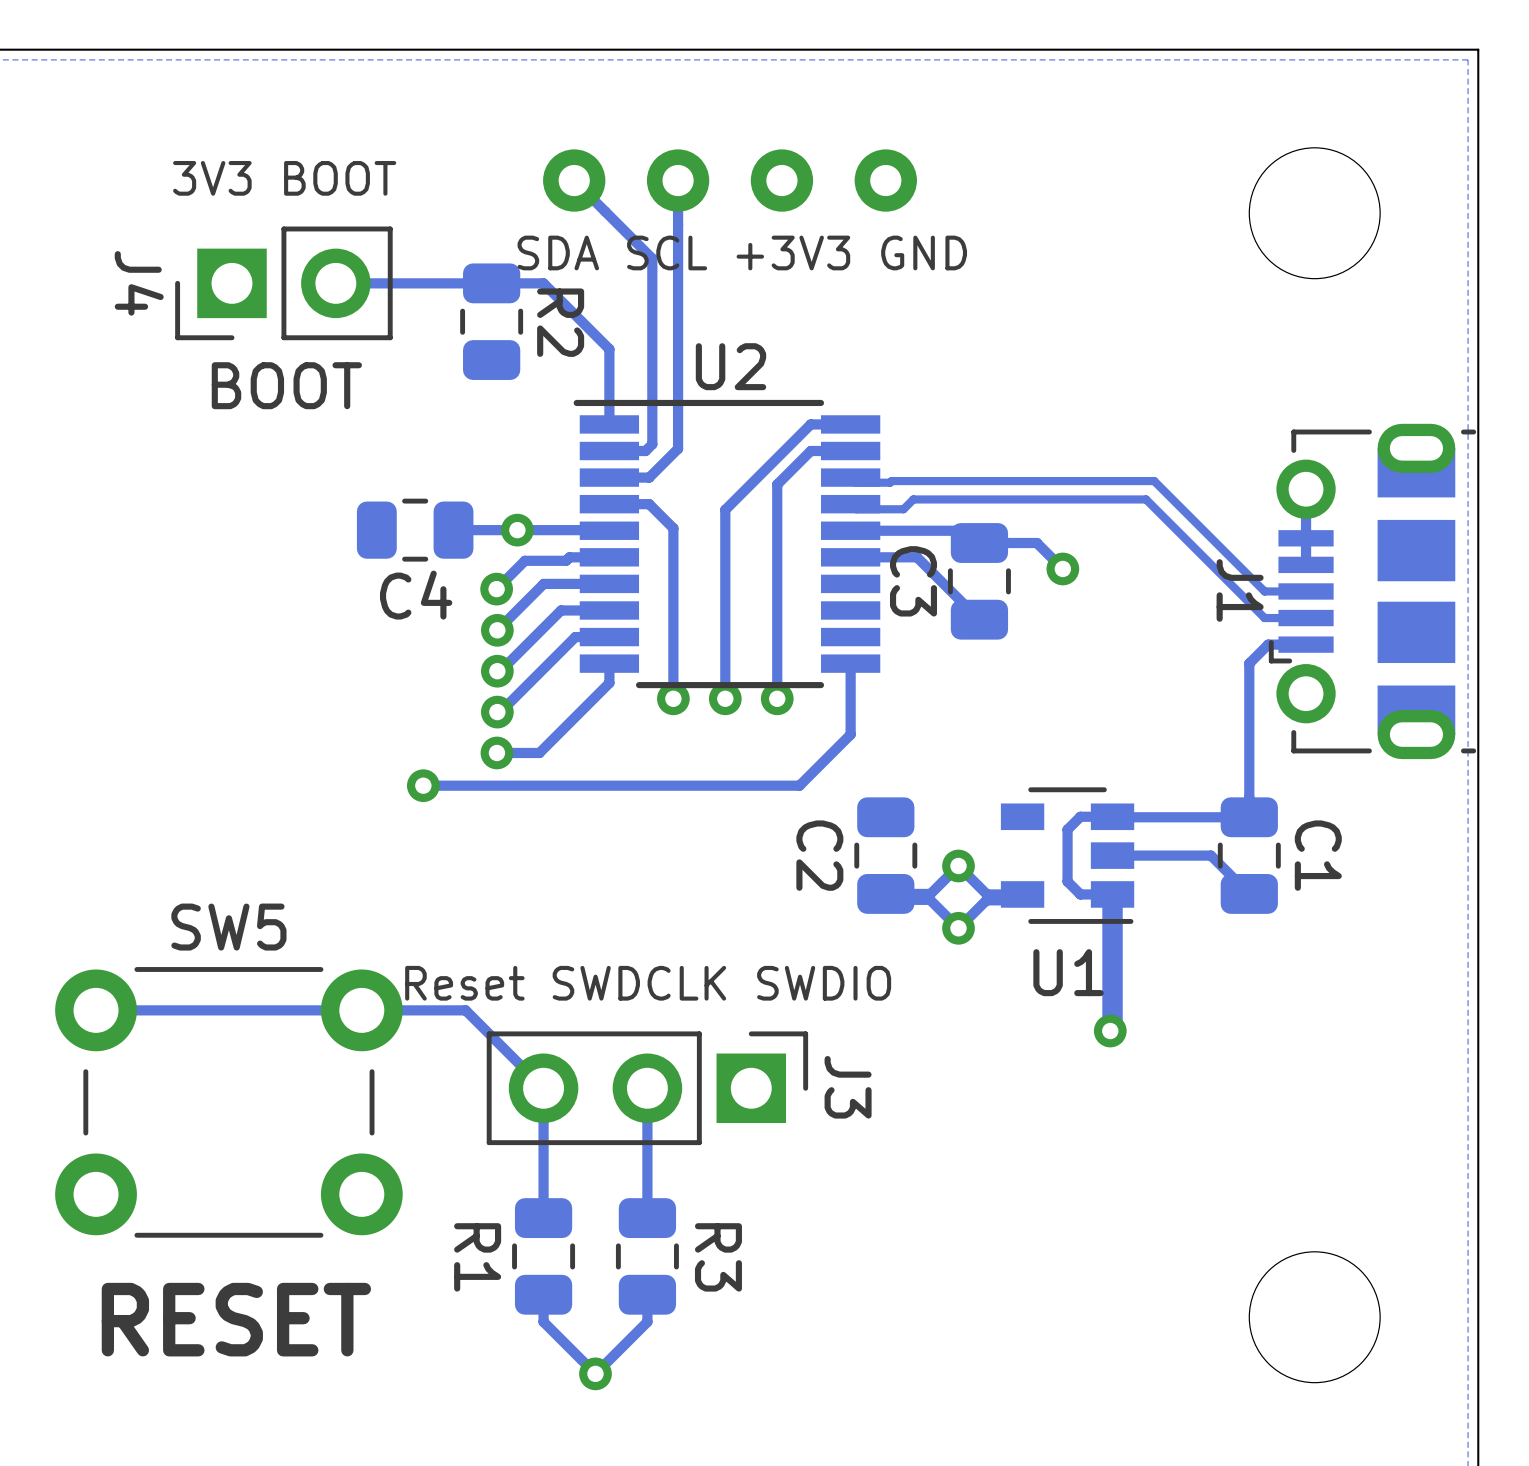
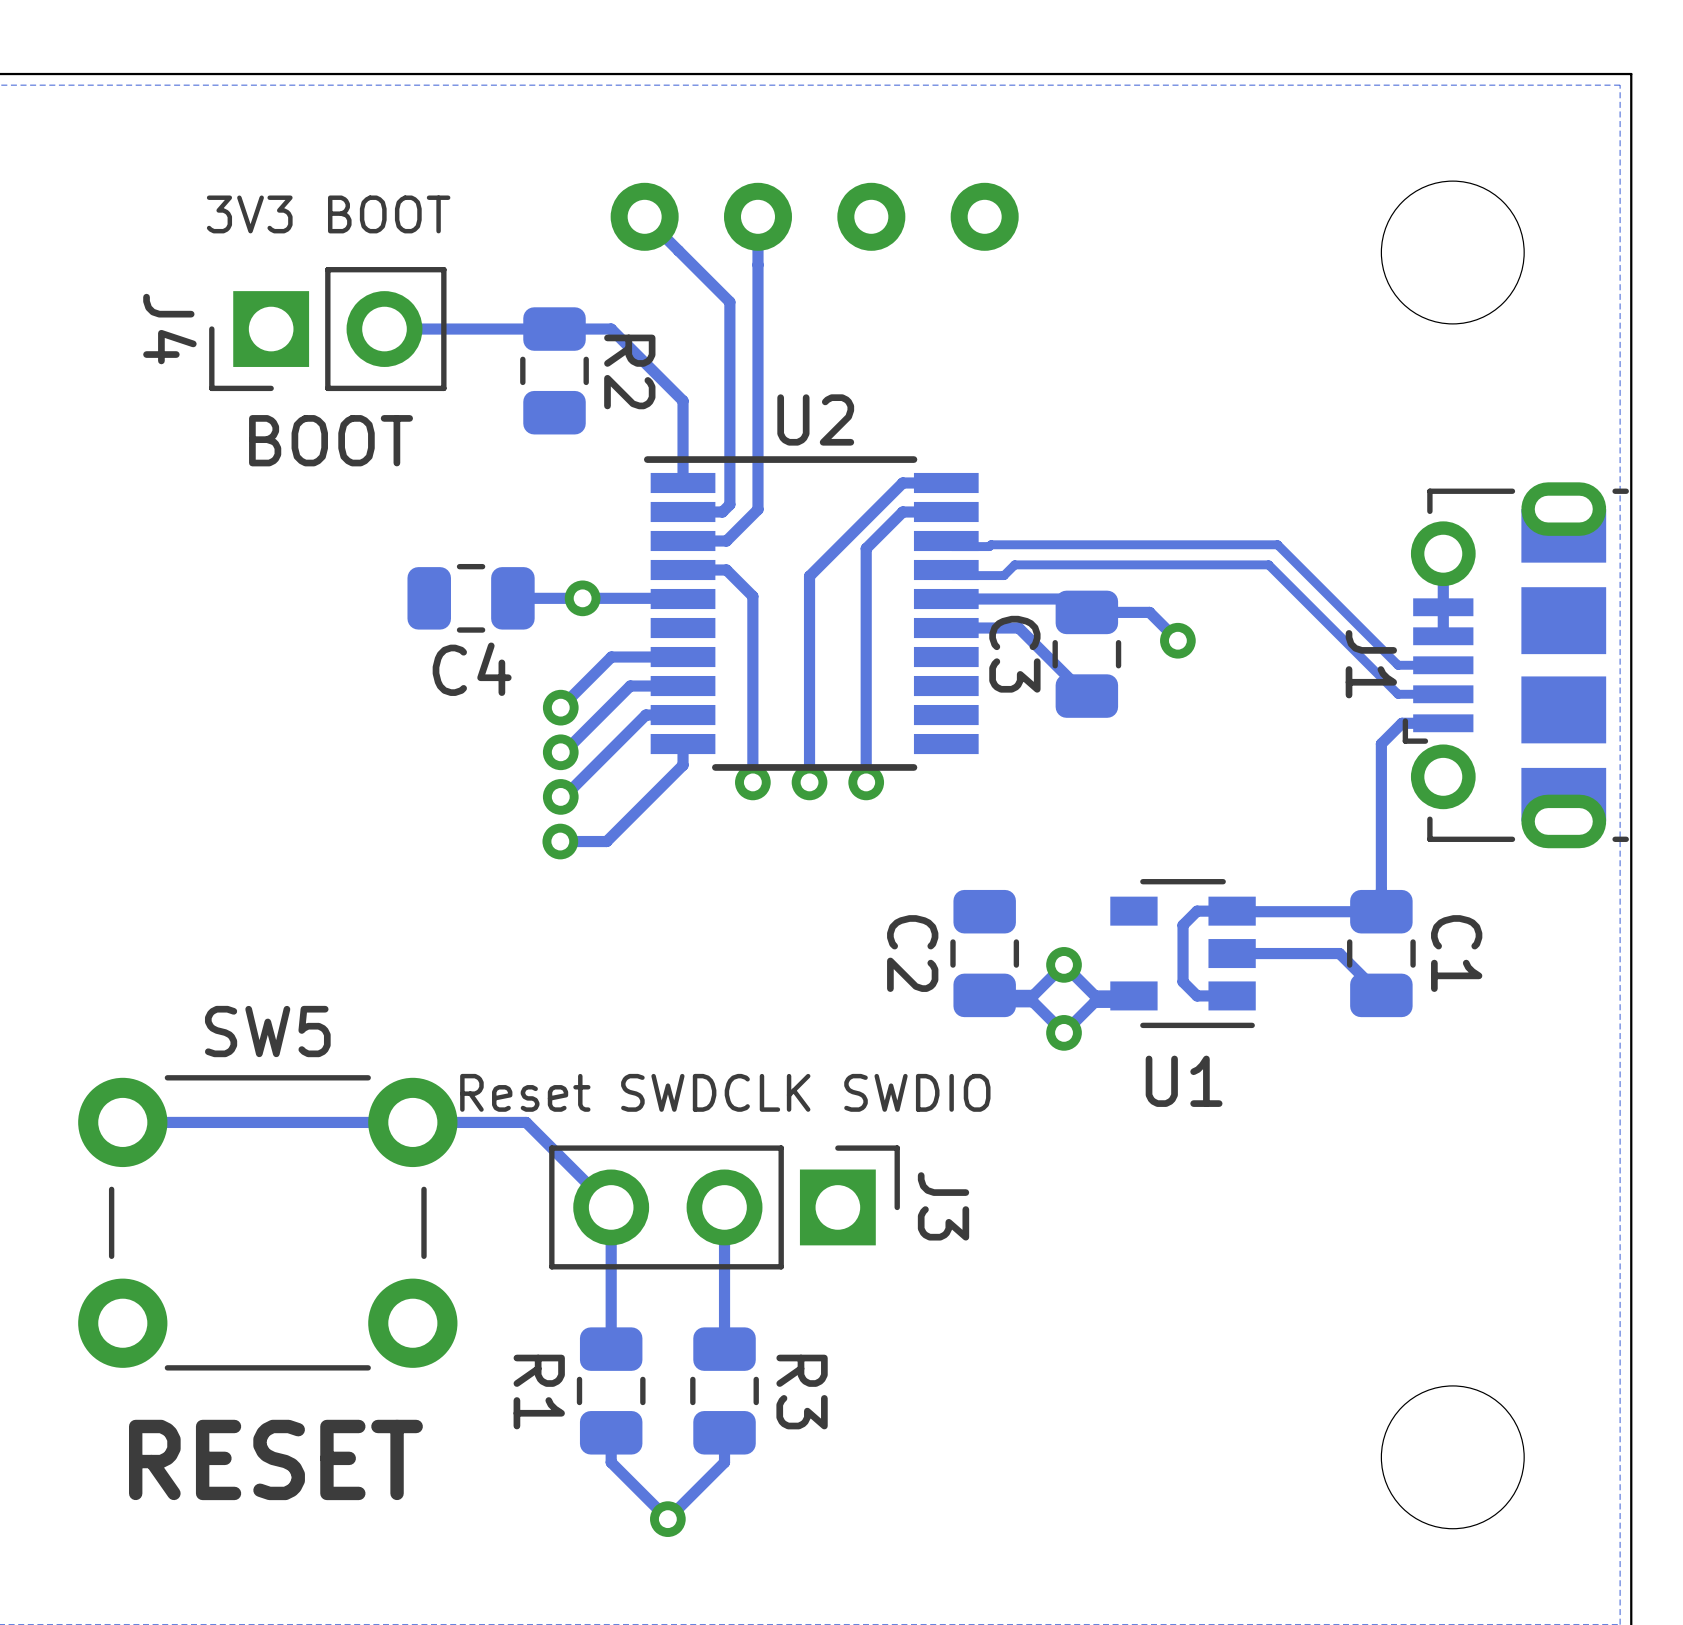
text: SDA SCL +3V3 GND (742, 252) -> none
track: (609, 557) (569, 557) (566, 560) (524, 560) (496, 589) -> none
via: (496, 589) -> none
track: (850, 663) (850, 734) (799, 785) (423, 785) -> none
via: (423, 785) -> none
track: (1112, 894) (1112, 1028) (1110, 1031) -> none
via: (1110, 1031) -> none

